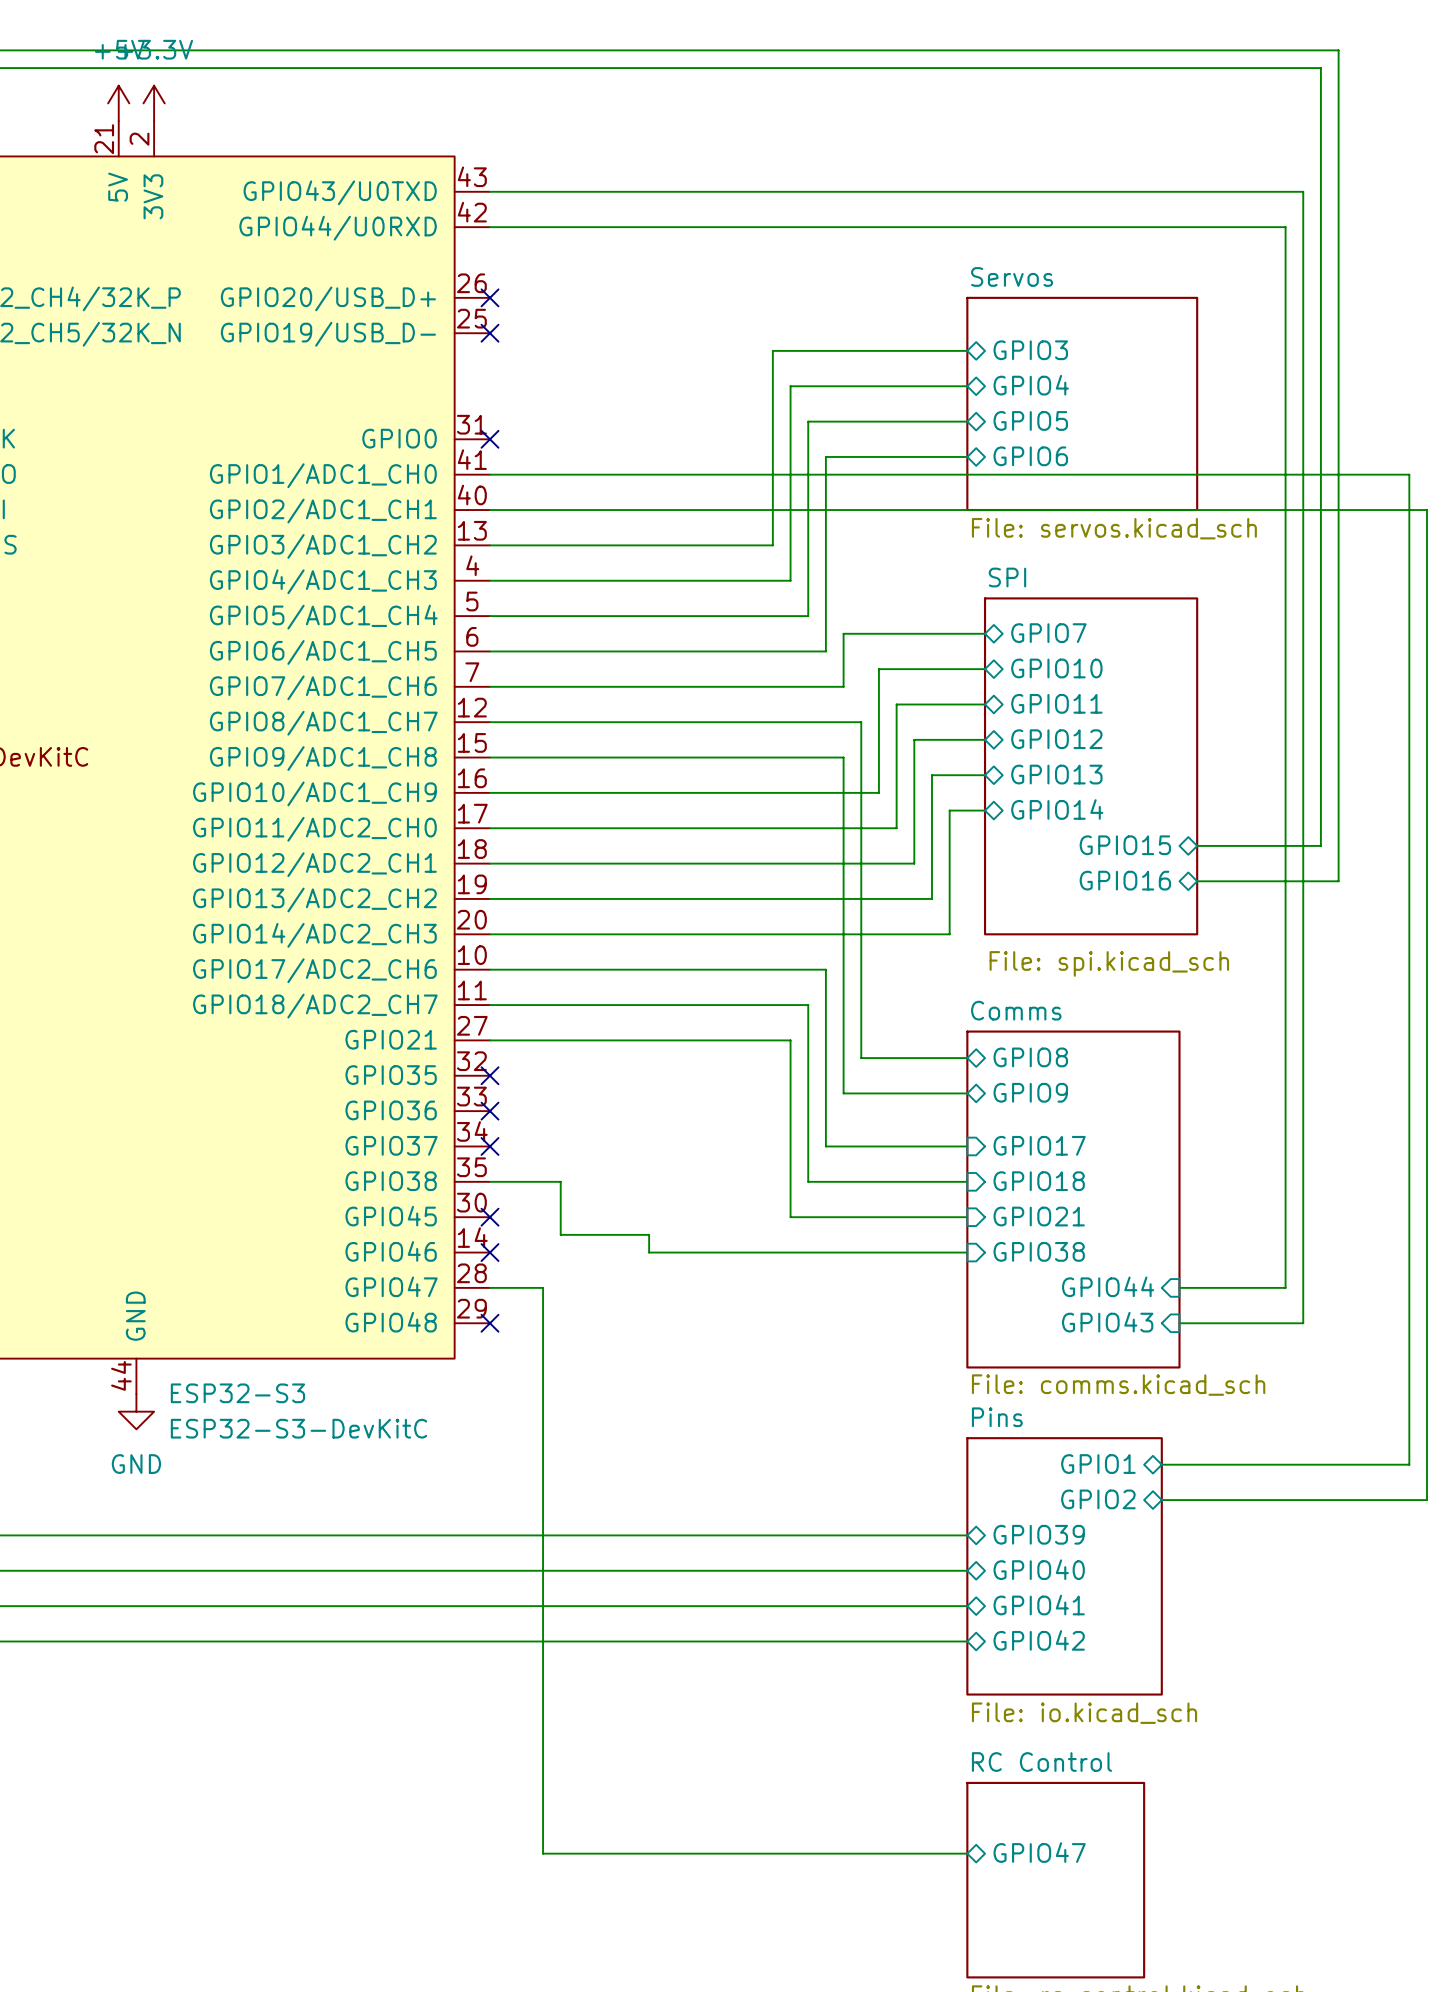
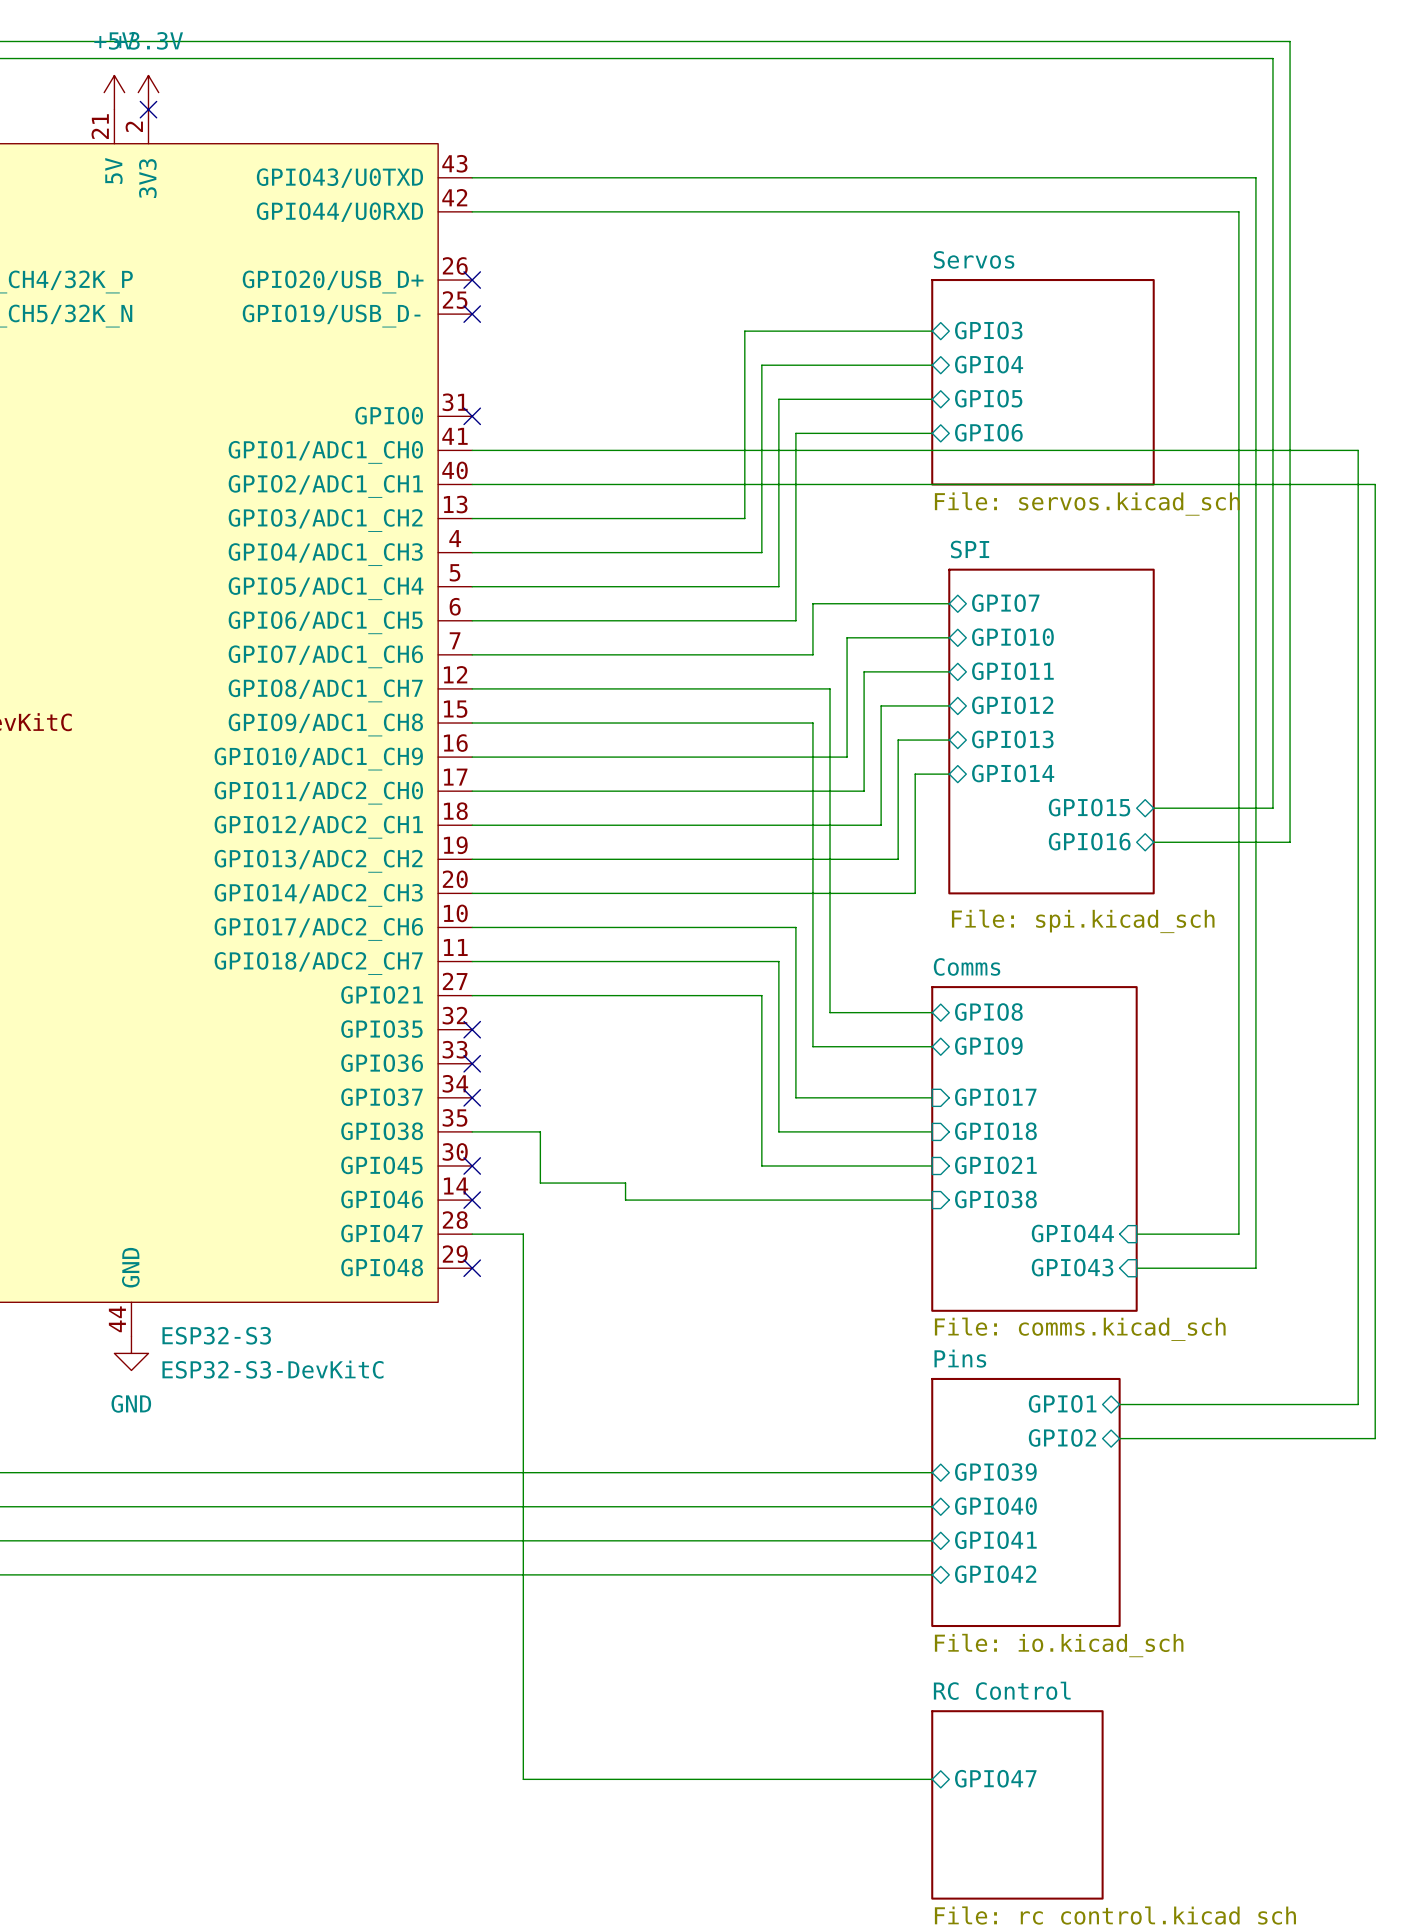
no-connect mark: none -> (148, 109)

